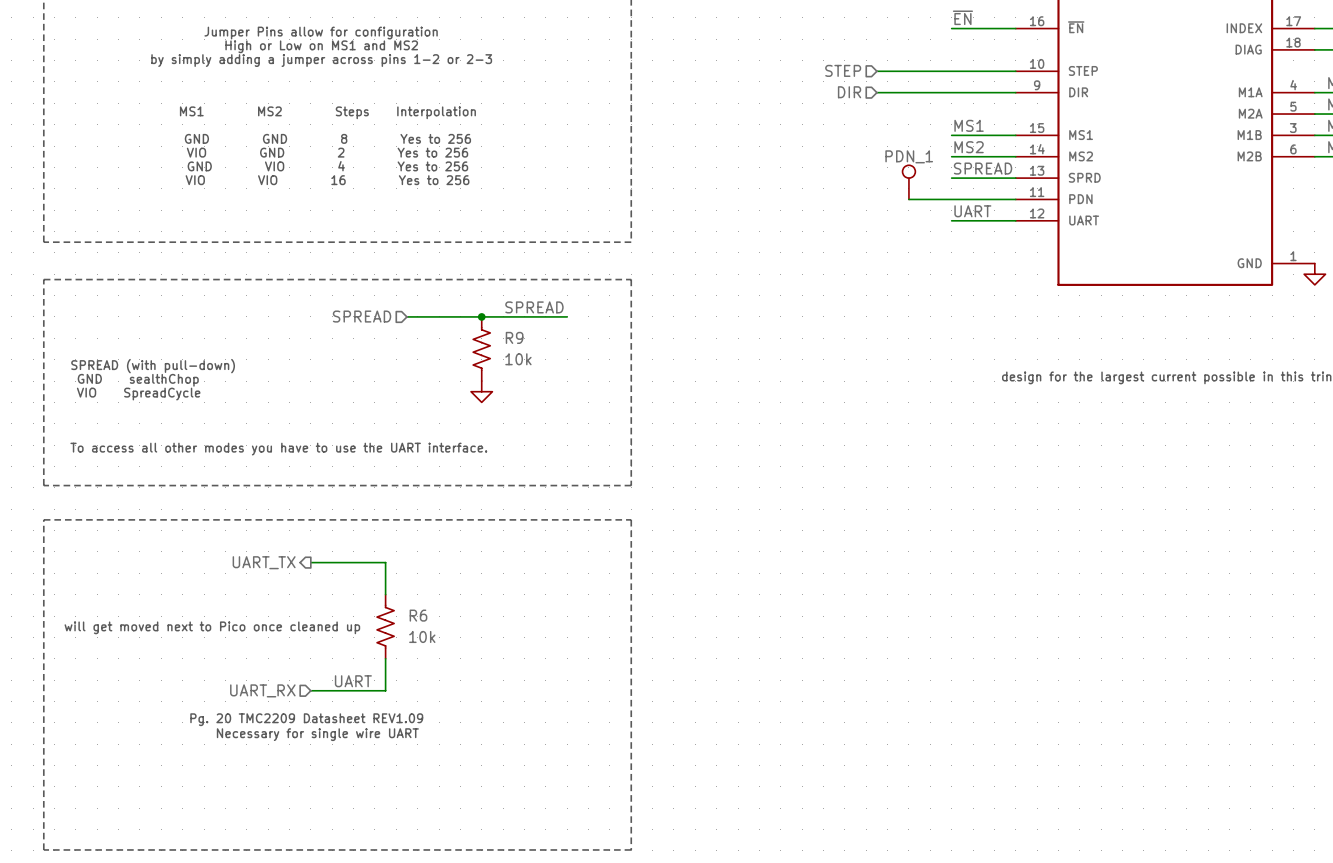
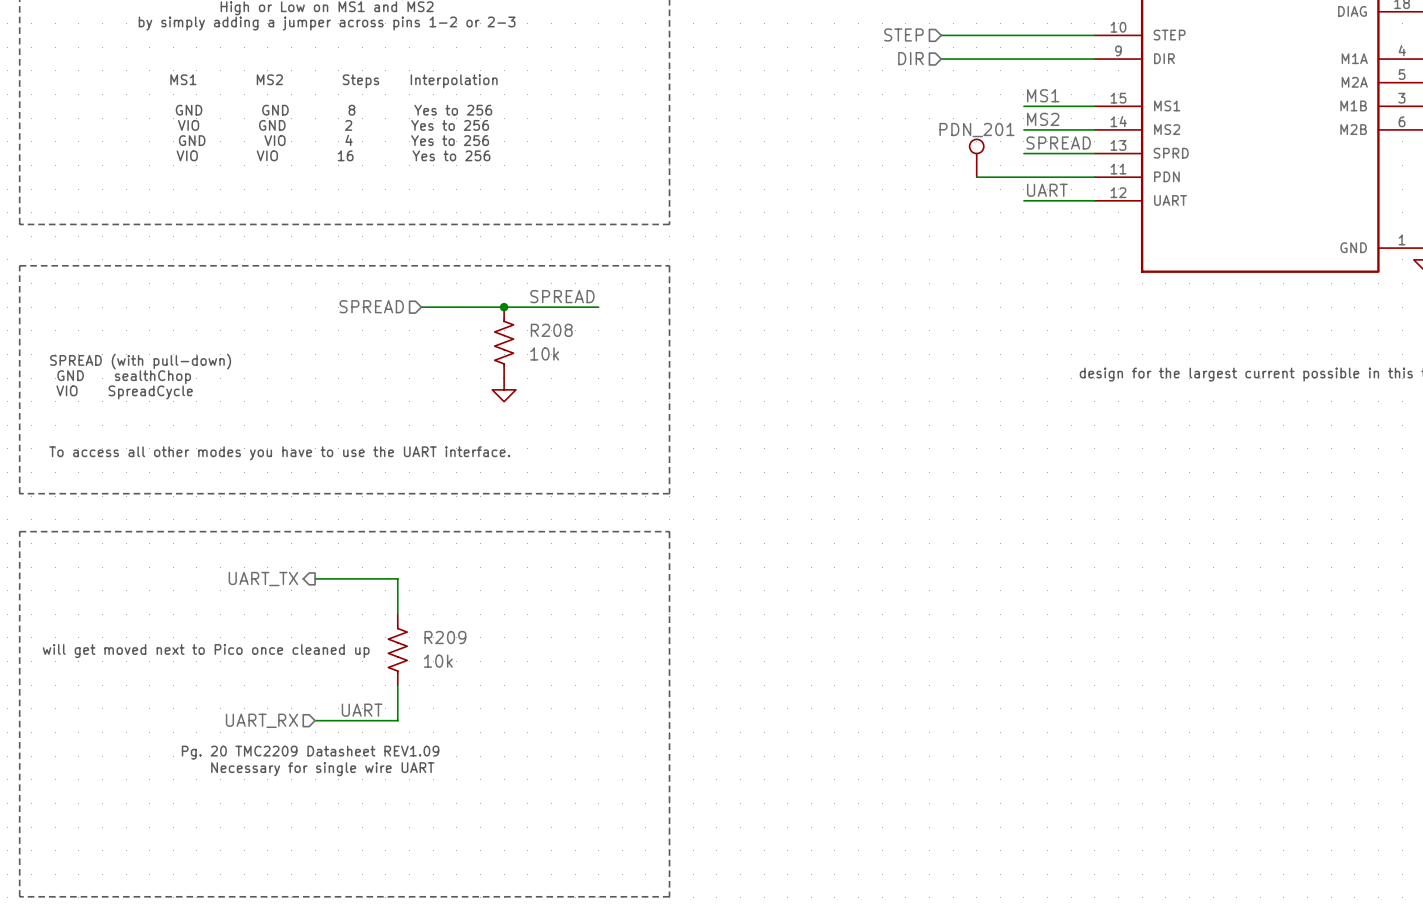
PDN_1 name: PDN_1 (909, 156) -> PDN_201 (976, 130)
R9 name: R9 (514, 337) -> R208 (551, 330)
R6 name: R6 (418, 615) -> R209 (445, 637)

